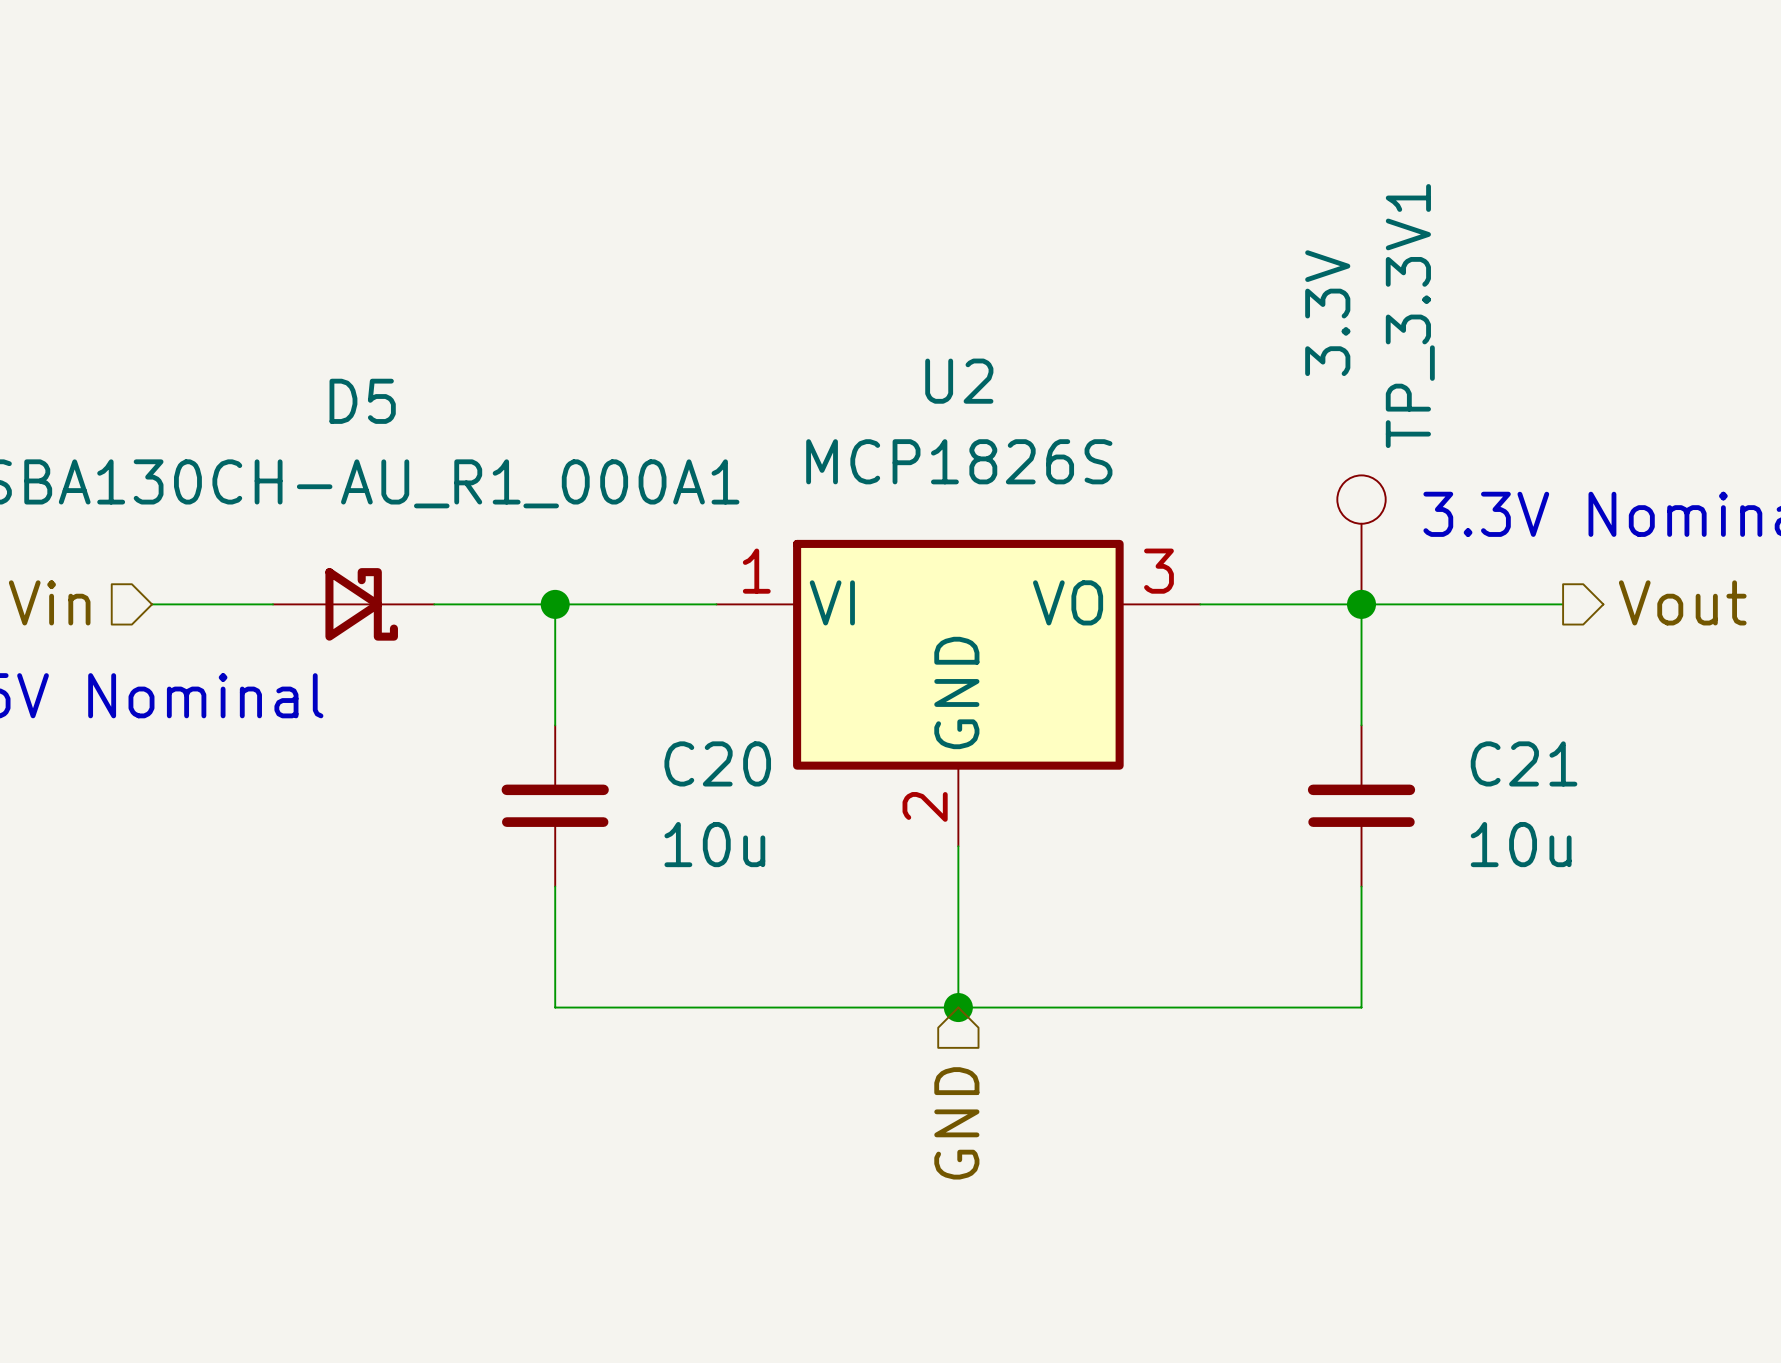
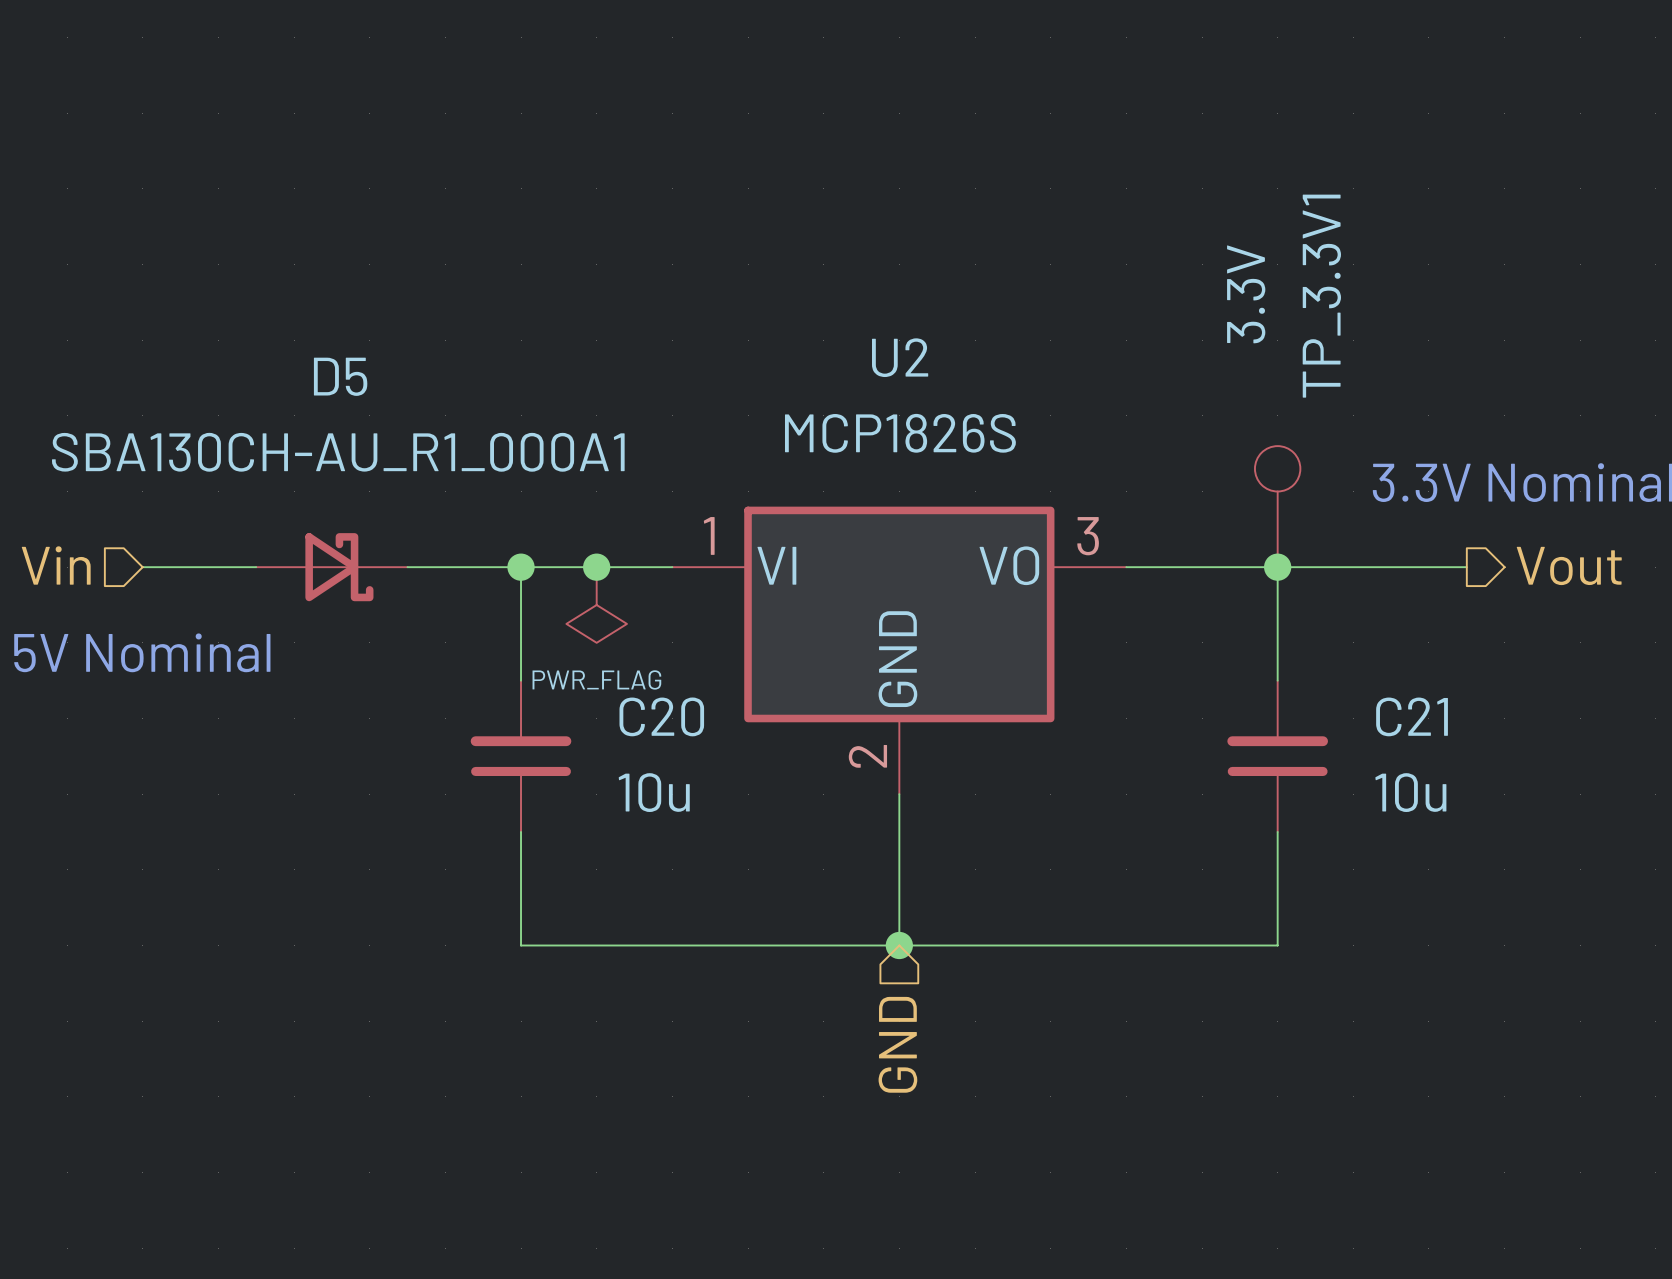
junction: none -> (596, 567)
power symbol: none -> PWR_FLAG (596, 605)

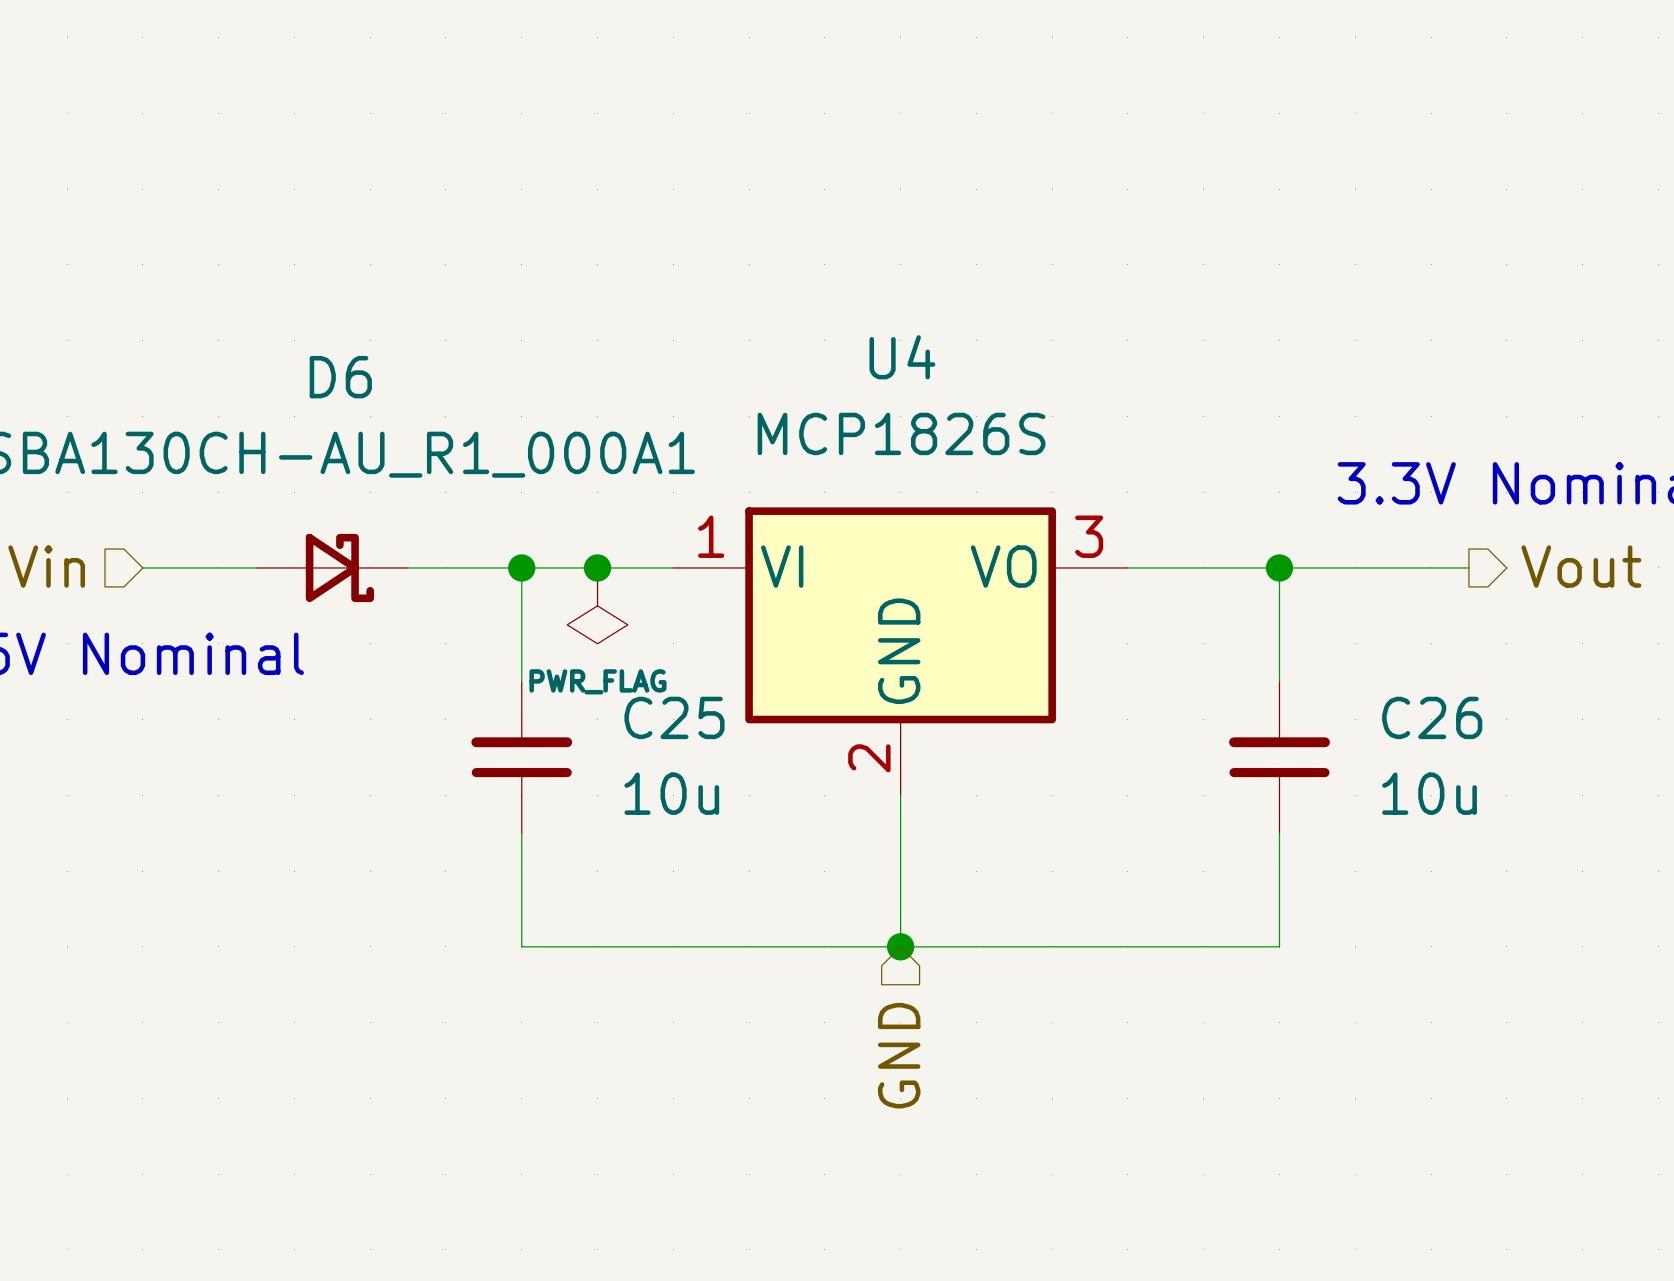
U2 name: U2 (900, 357) -> U4 (902, 357)
D5 name: D5 (340, 376) -> D6 (340, 377)
TP_3.3V1: 3.3V (1277, 506) -> none
C20 name: C20 (661, 716) -> C25 (674, 717)
C21 name: C21 (1412, 716) -> C26 (1432, 717)

